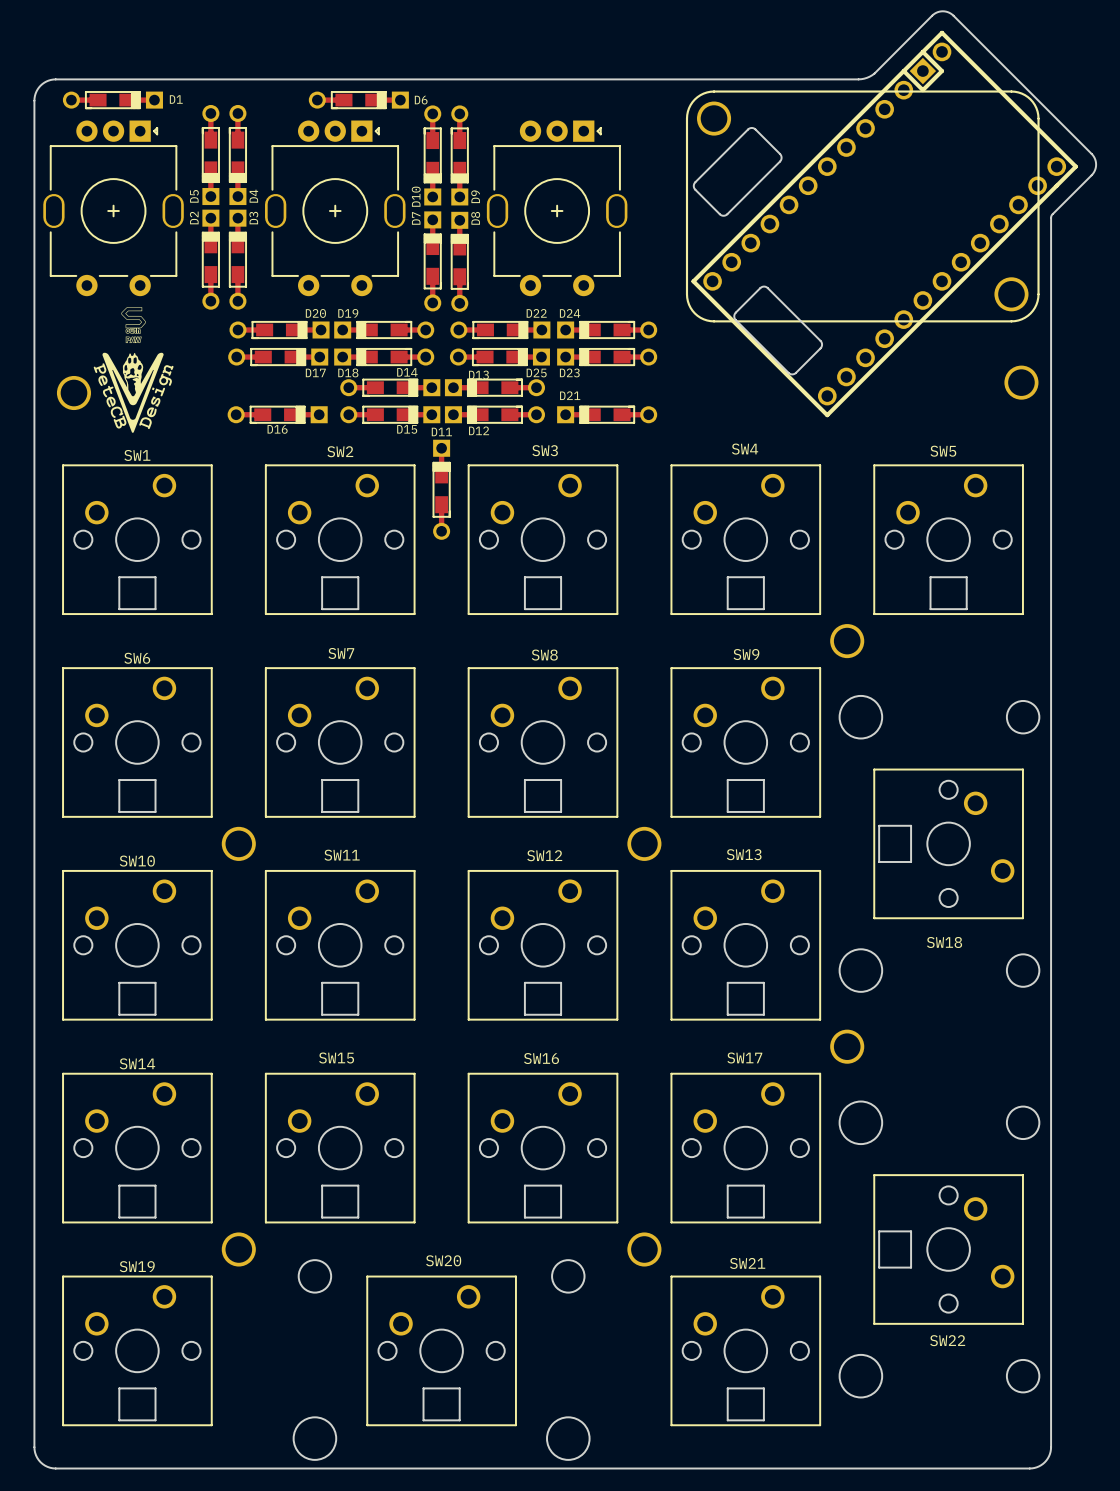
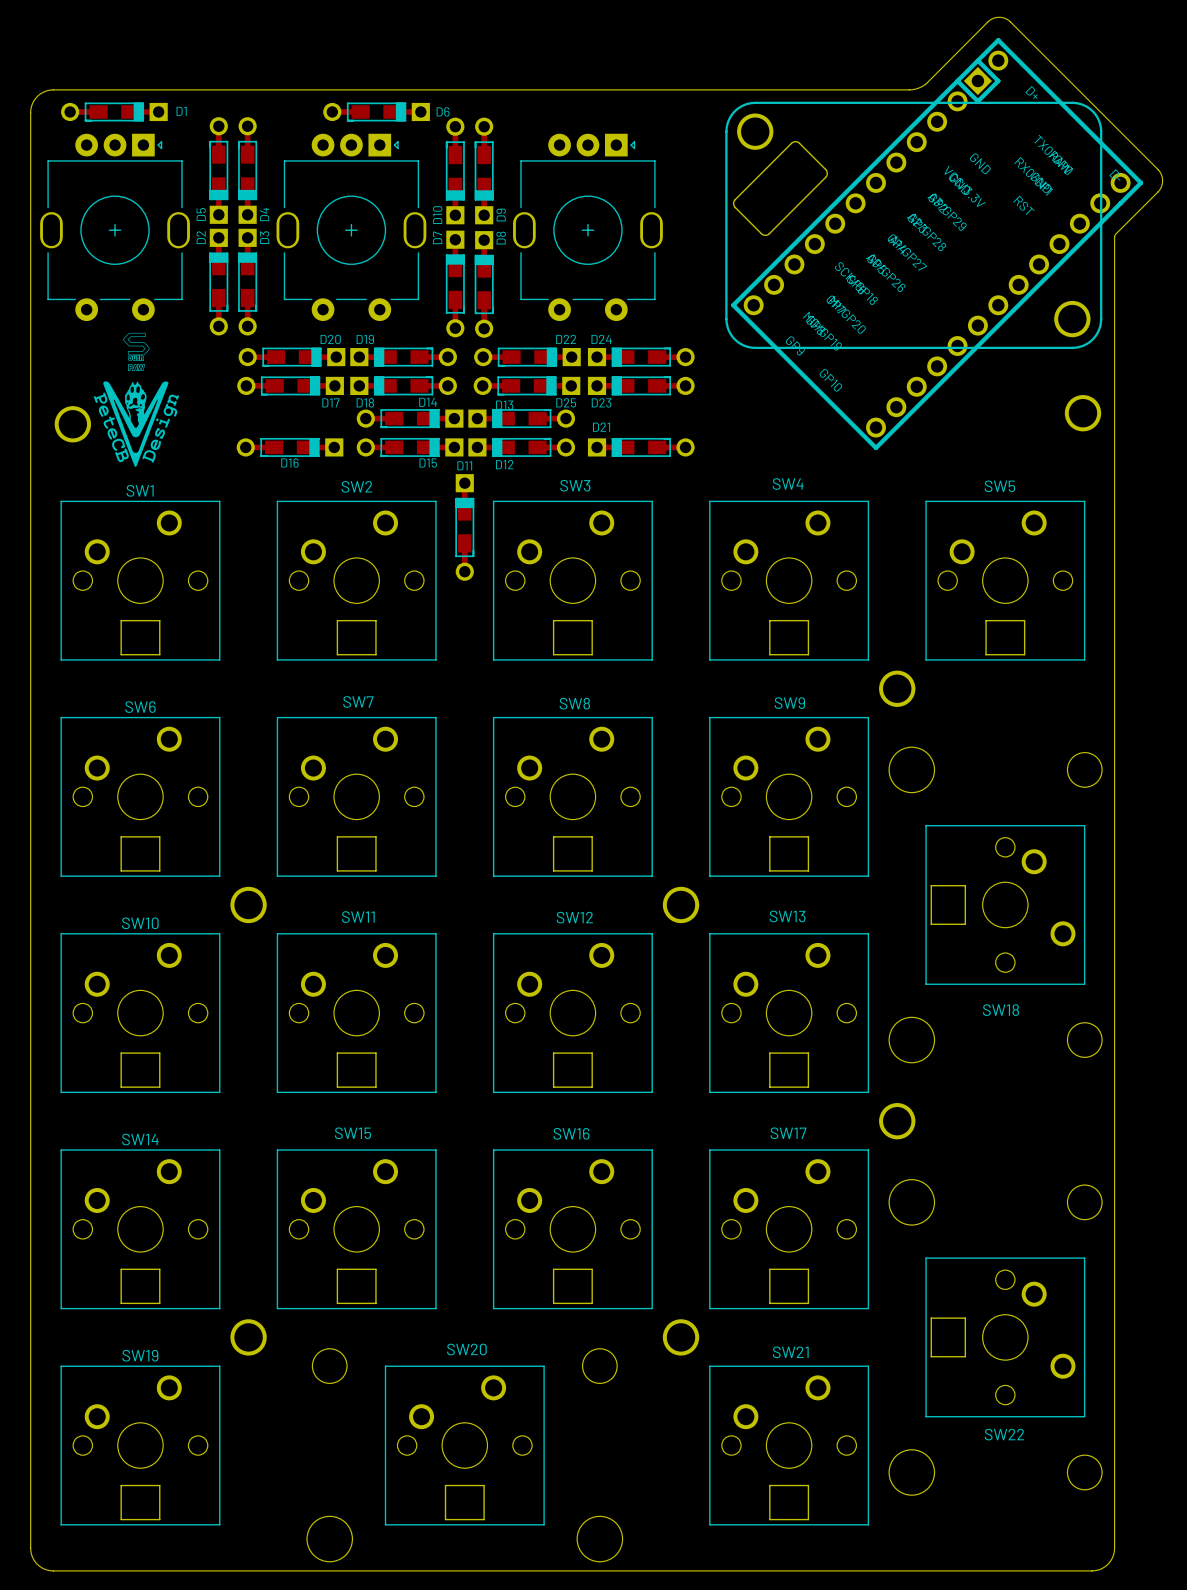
part footprint: [691, 30, 1078, 418] -> [731, 38, 1144, 451]

